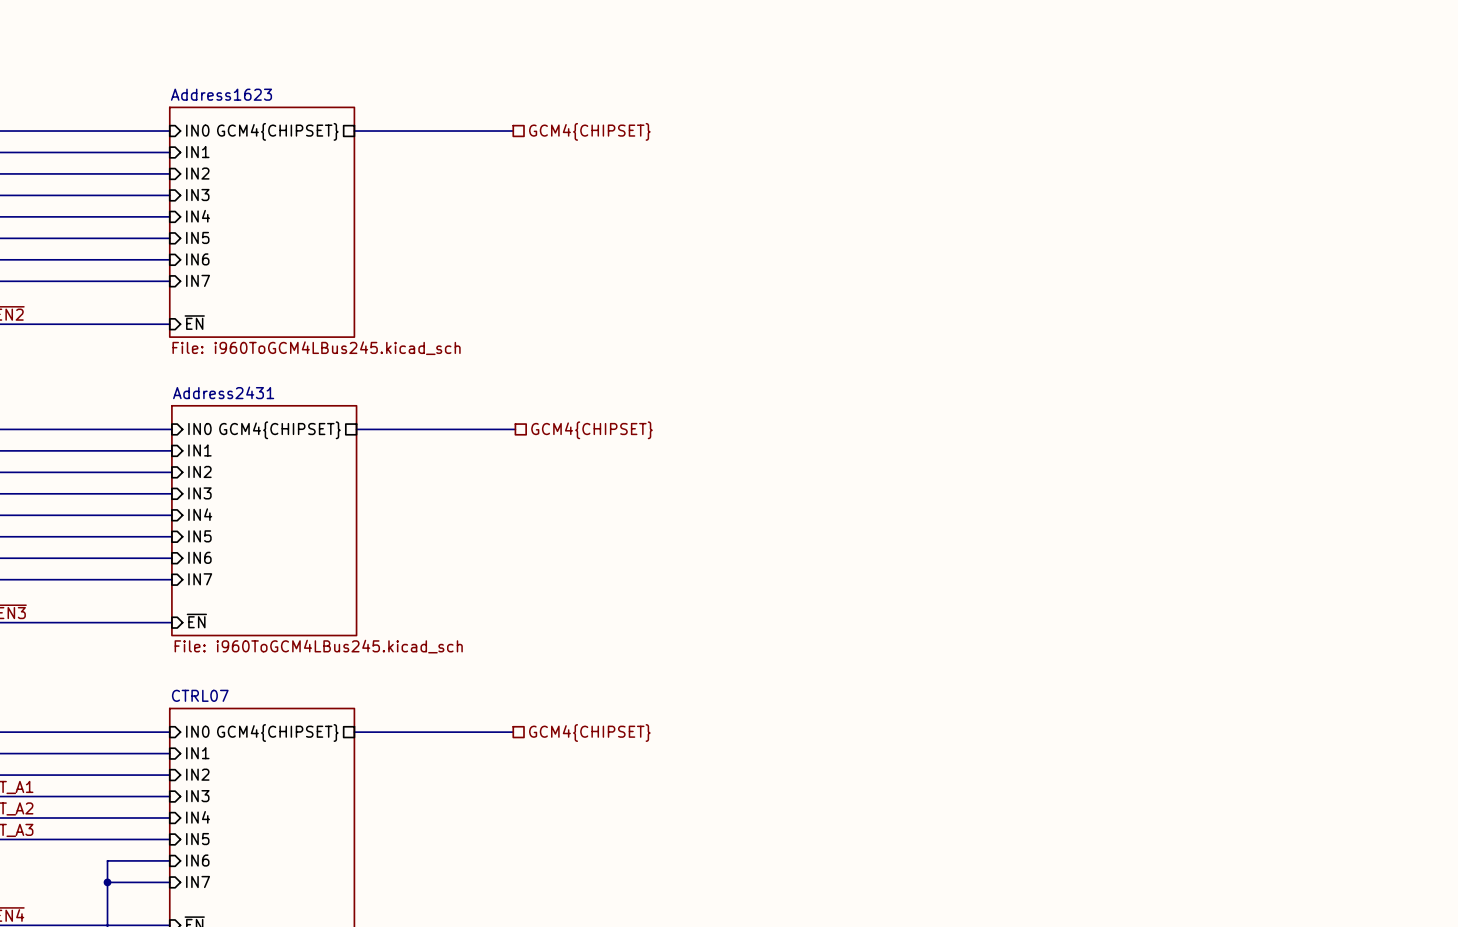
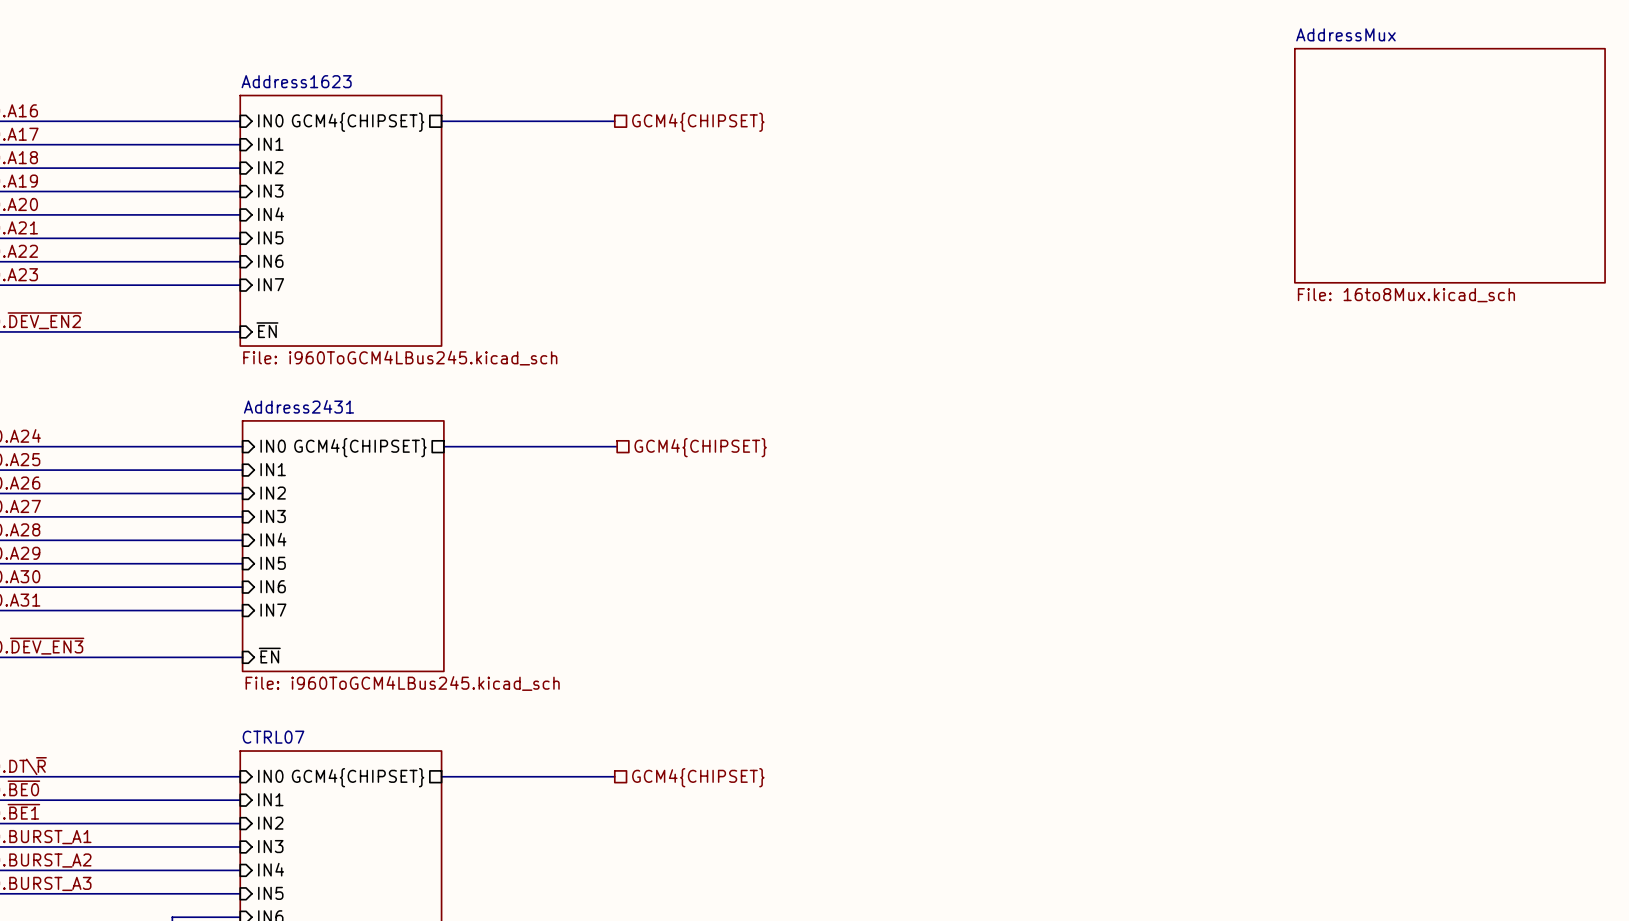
sheet AddressMux: none -> File: 16to8Mux.kicad_sch (1449, 165)

